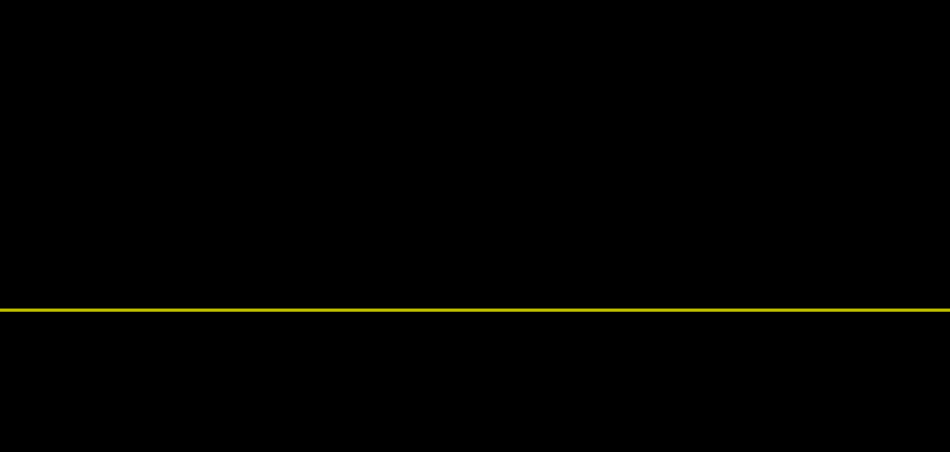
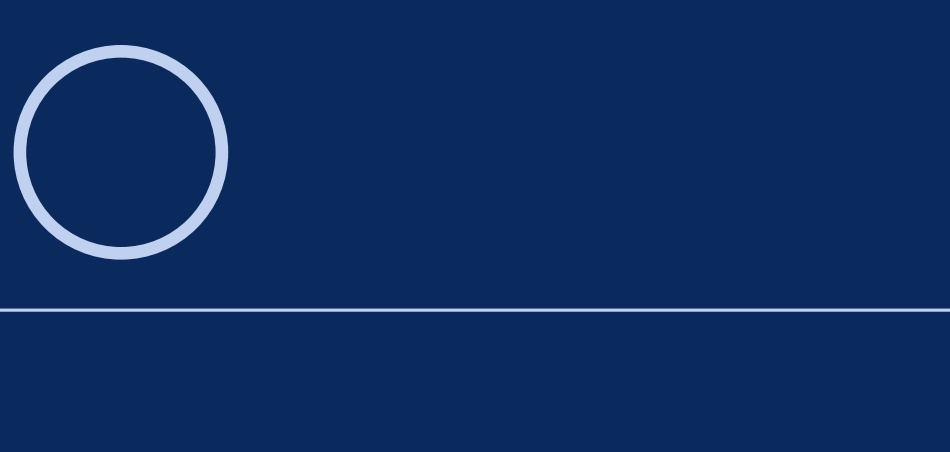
round board edge: none -> [13, 45, 229, 260]

